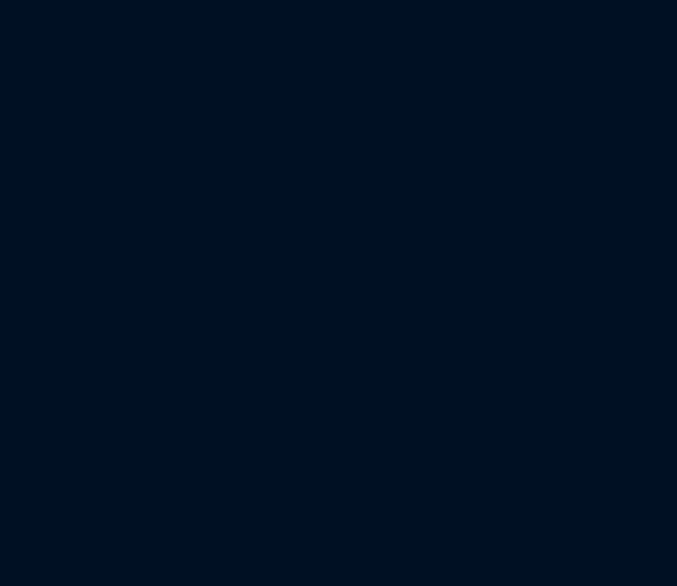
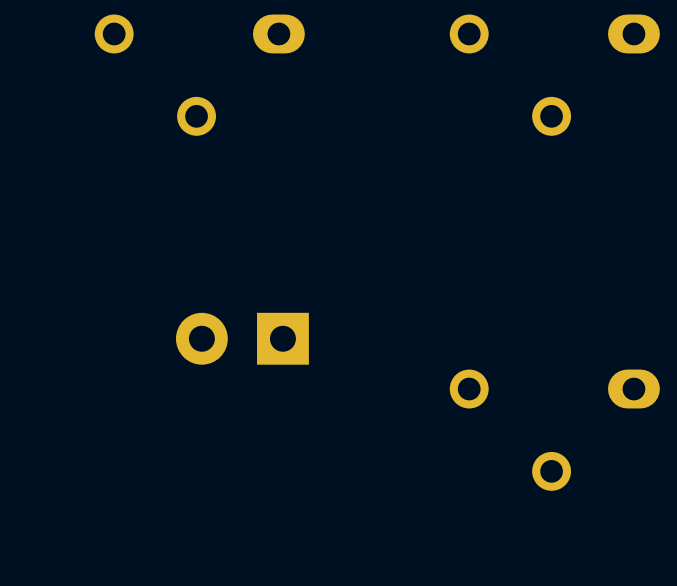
part: none -> (199, 75)
part: none -> (554, 75)
part: none -> (242, 338)
part: none -> (554, 430)

